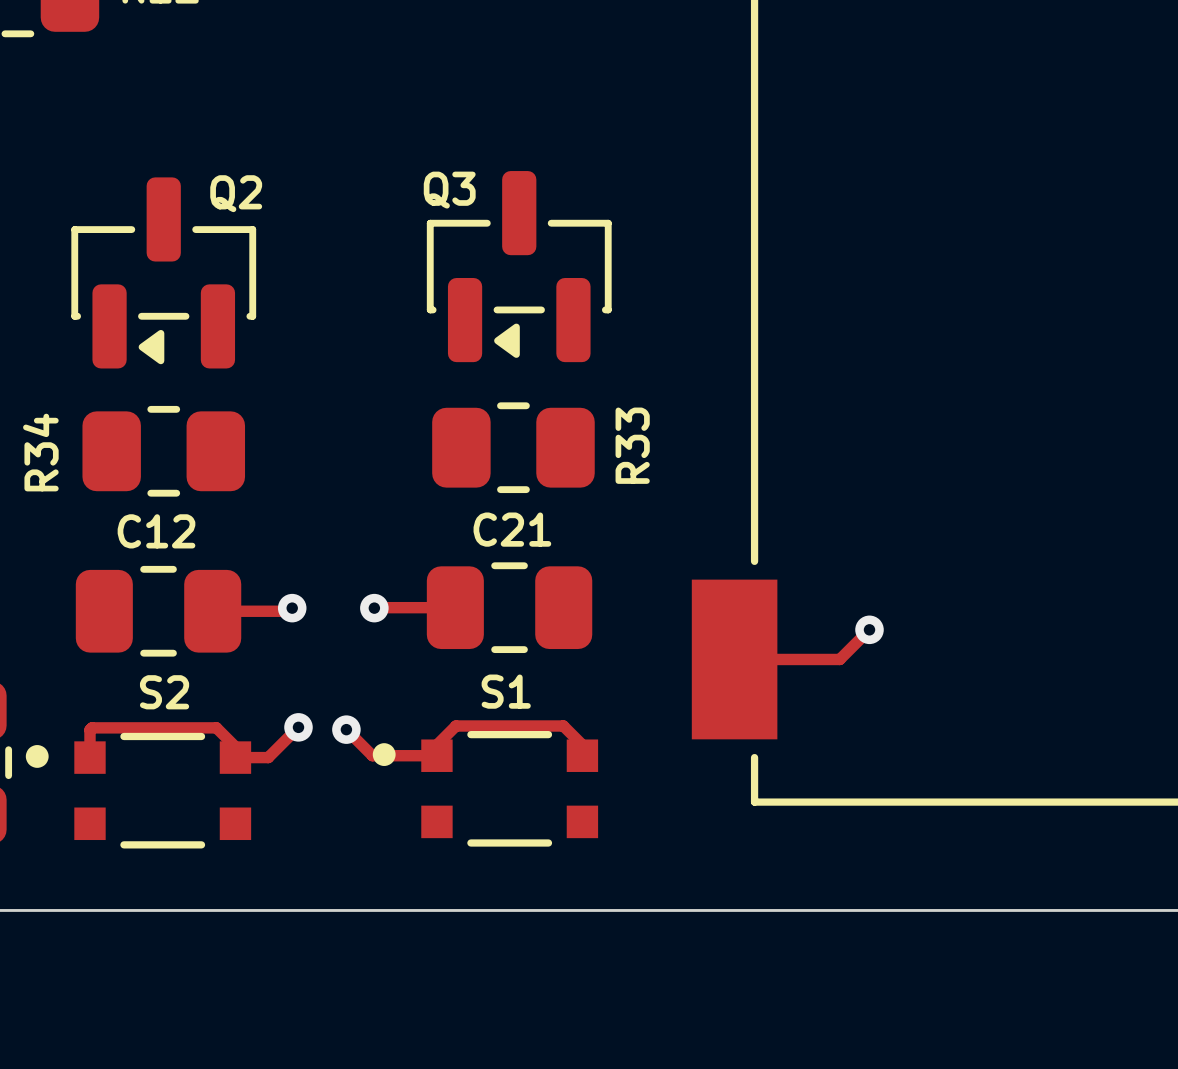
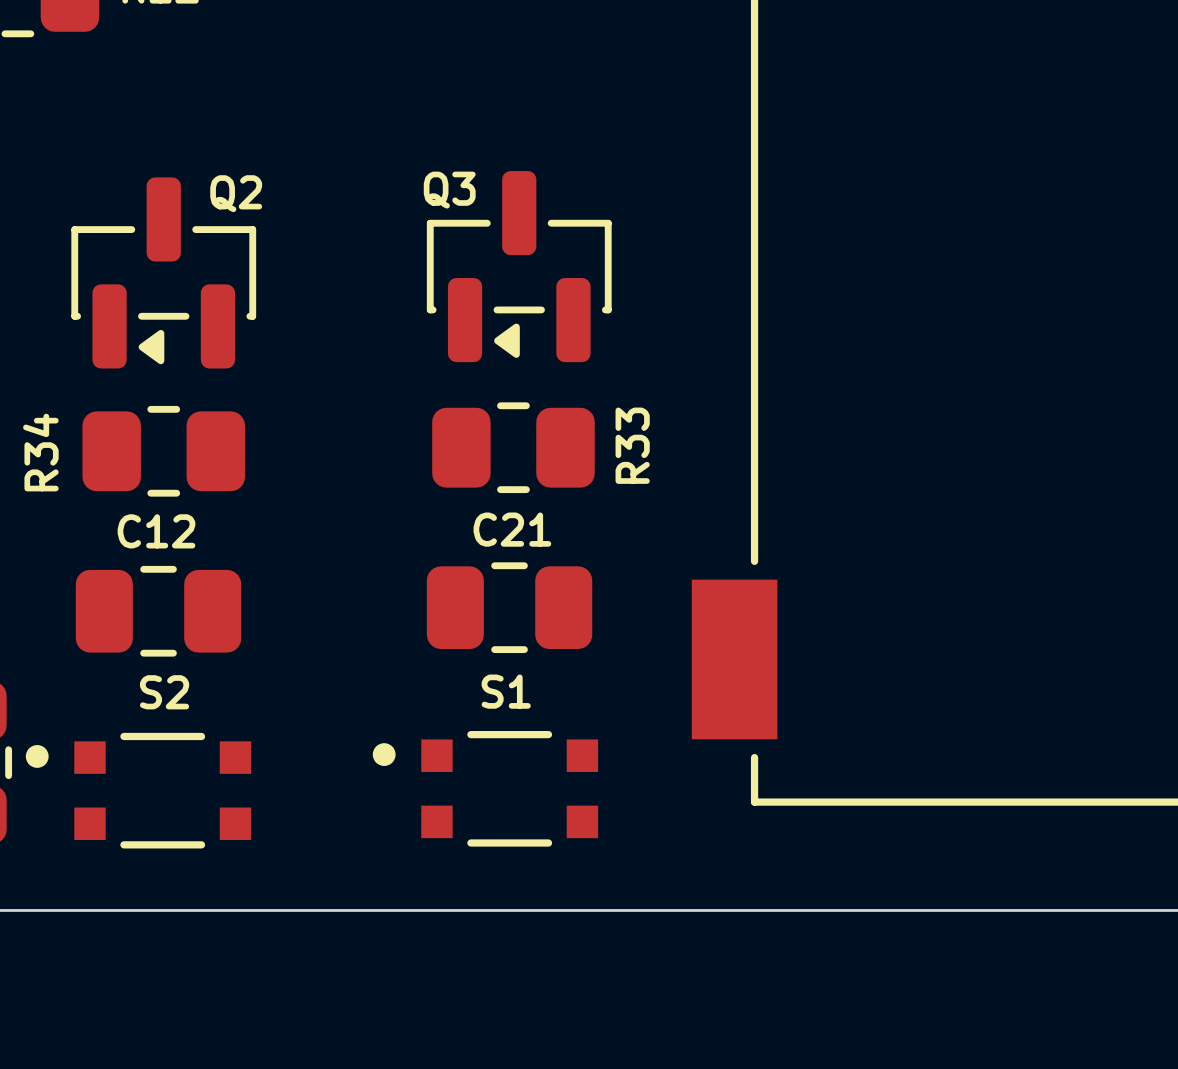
track: (374, 607) (455, 607) -> none
track: (292, 608) (289, 611) (212, 611) -> none
via: (292, 608) -> none
via: (374, 608) -> none
track: (869, 629) (839, 659) (734, 659) -> none
via: (869, 629) -> none
track: (298, 727) (268, 757) (235, 757) (235, 746) (216, 727) (92, 727) (89, 729) (89, 757) -> none
via: (298, 727) -> none
track: (346, 729) (372, 755) (436, 755) (436, 745) (455, 726) (563, 726) (582, 745) (582, 755) -> none
via: (346, 729) -> none

